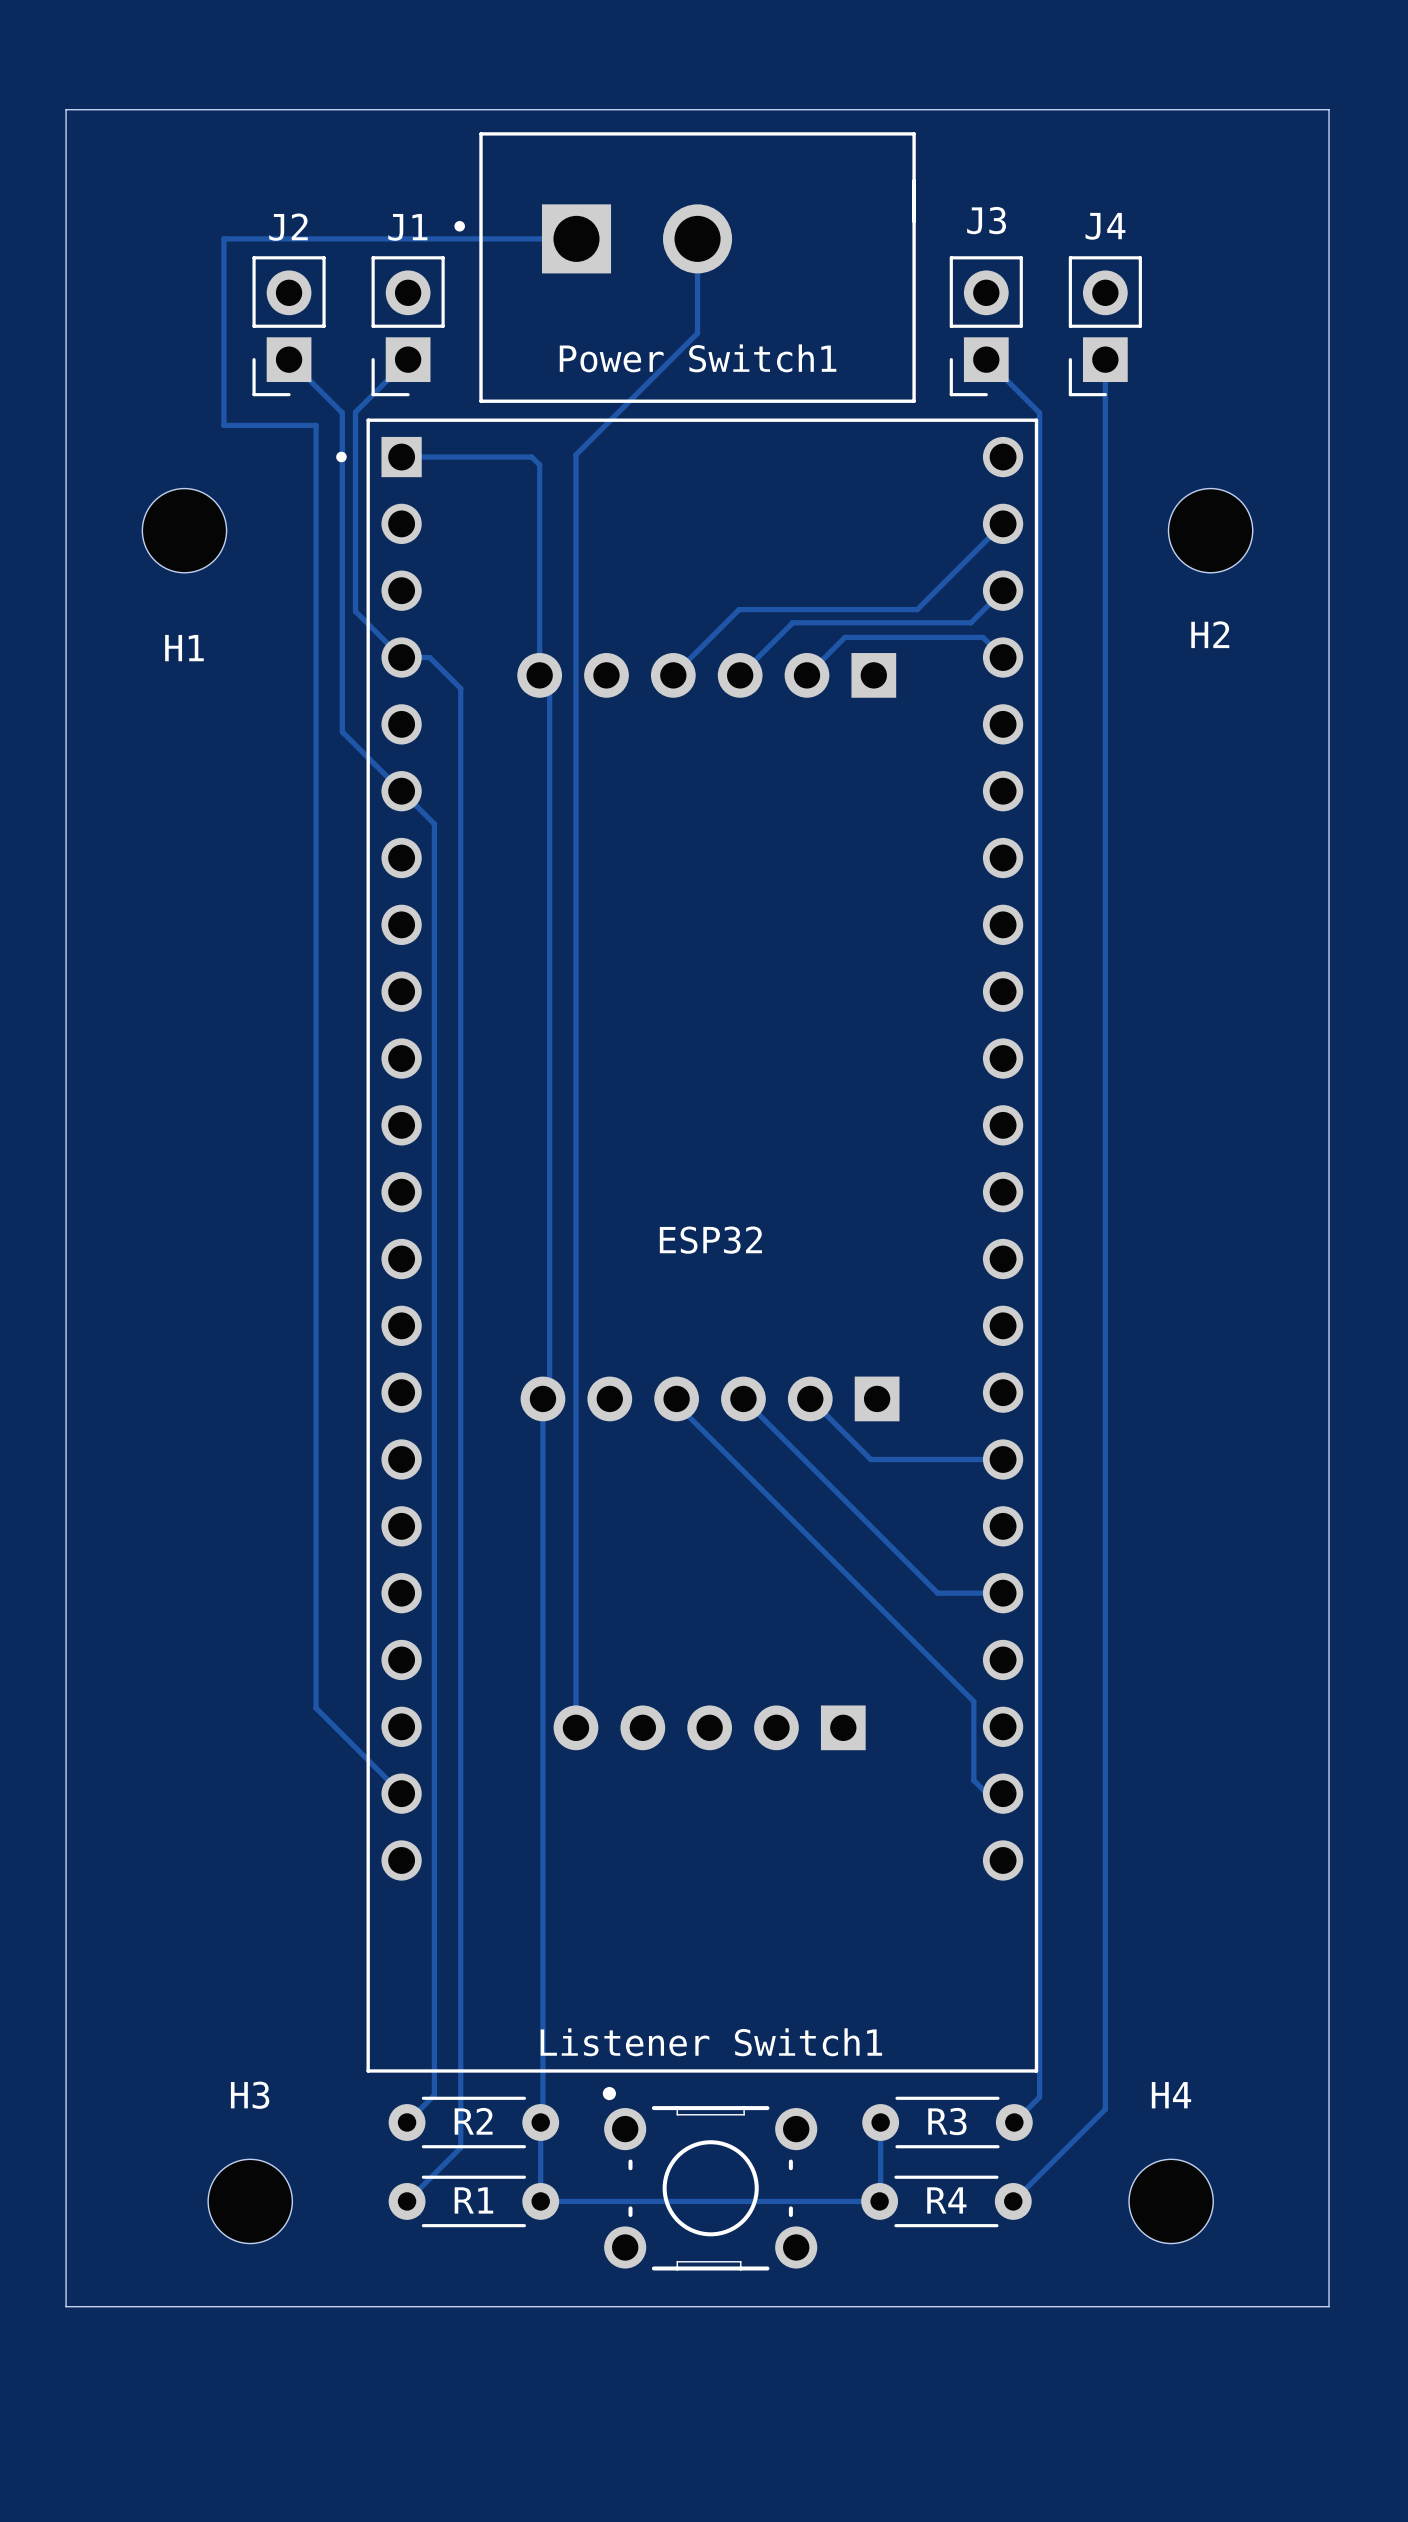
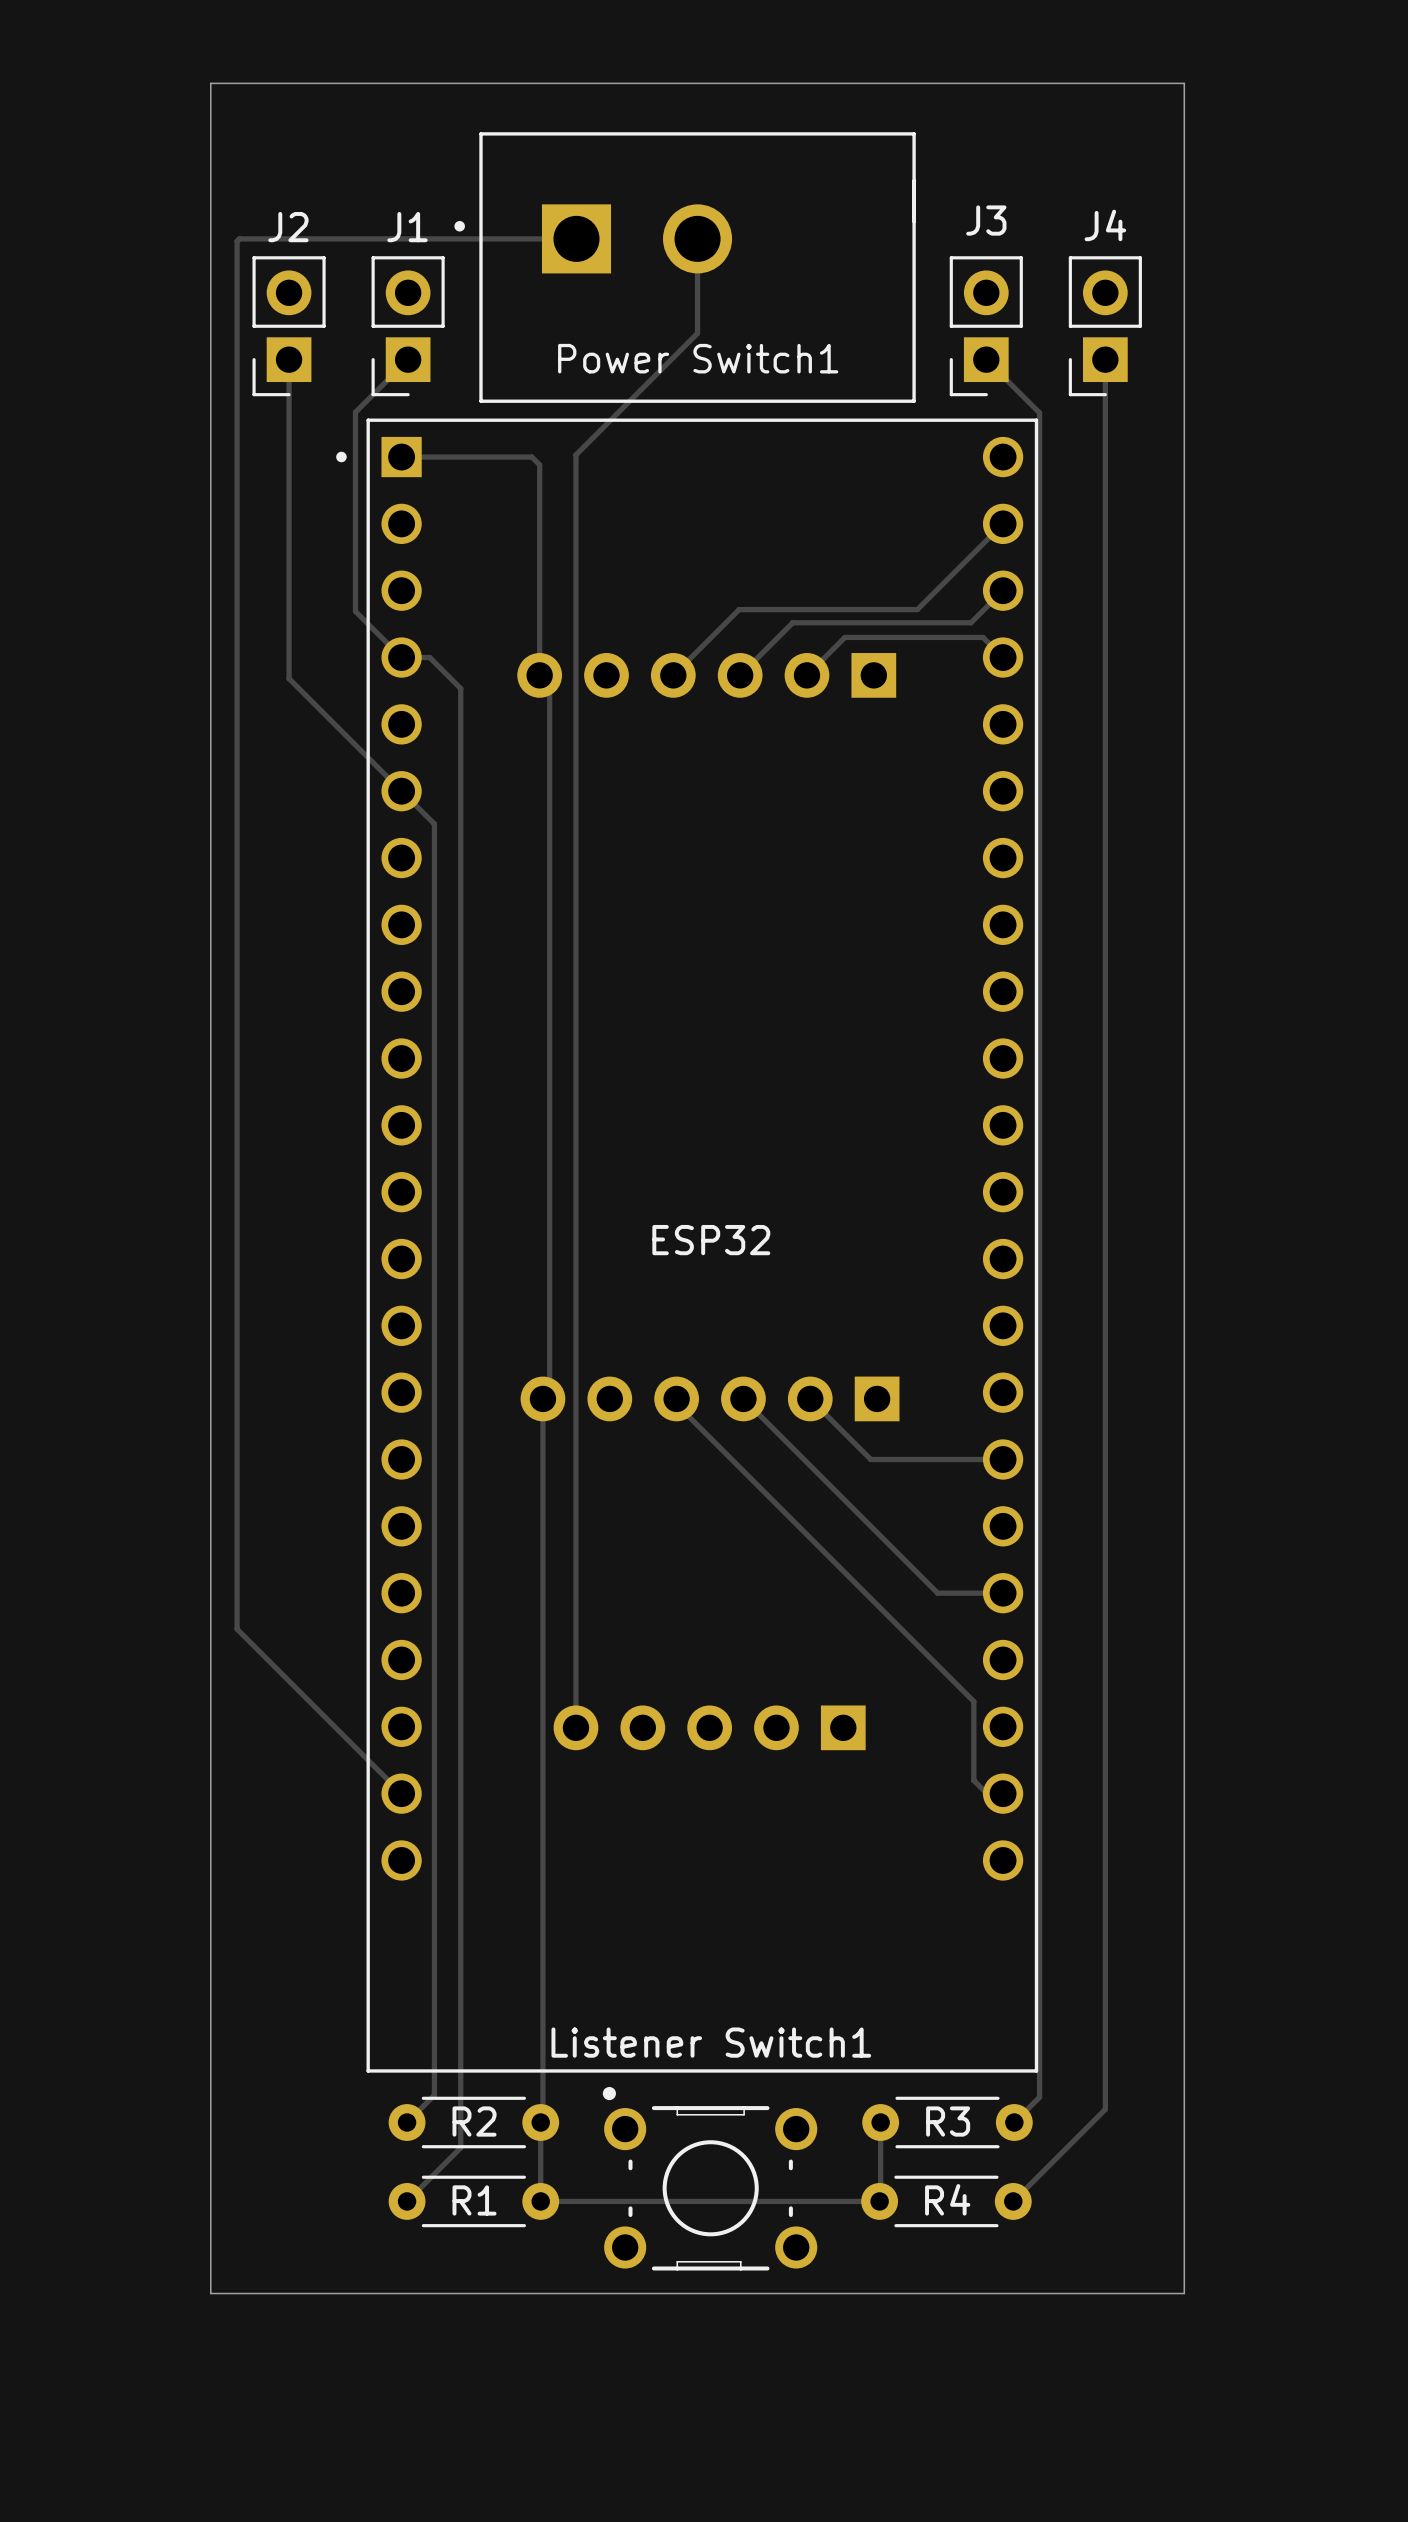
board edge: (66, 109) (1329, 109) (1329, 2306) (66, 2306) (66, 109) -> (210, 83) (210, 2293) (1184, 2293) (1184, 83) (210, 83)
track: (239, 238) (223, 238) (223, 425) (316, 425) (316, 1708) -> (239, 238) (237, 241) (237, 1629) (316, 1708)
track: (289, 359) (342, 412) (342, 731) -> (289, 359) (289, 678) (342, 731)
H1: (184, 530) -> none
H2: (1210, 530) -> none
H3: (250, 2201) -> none
H4: (1171, 2201) -> none

